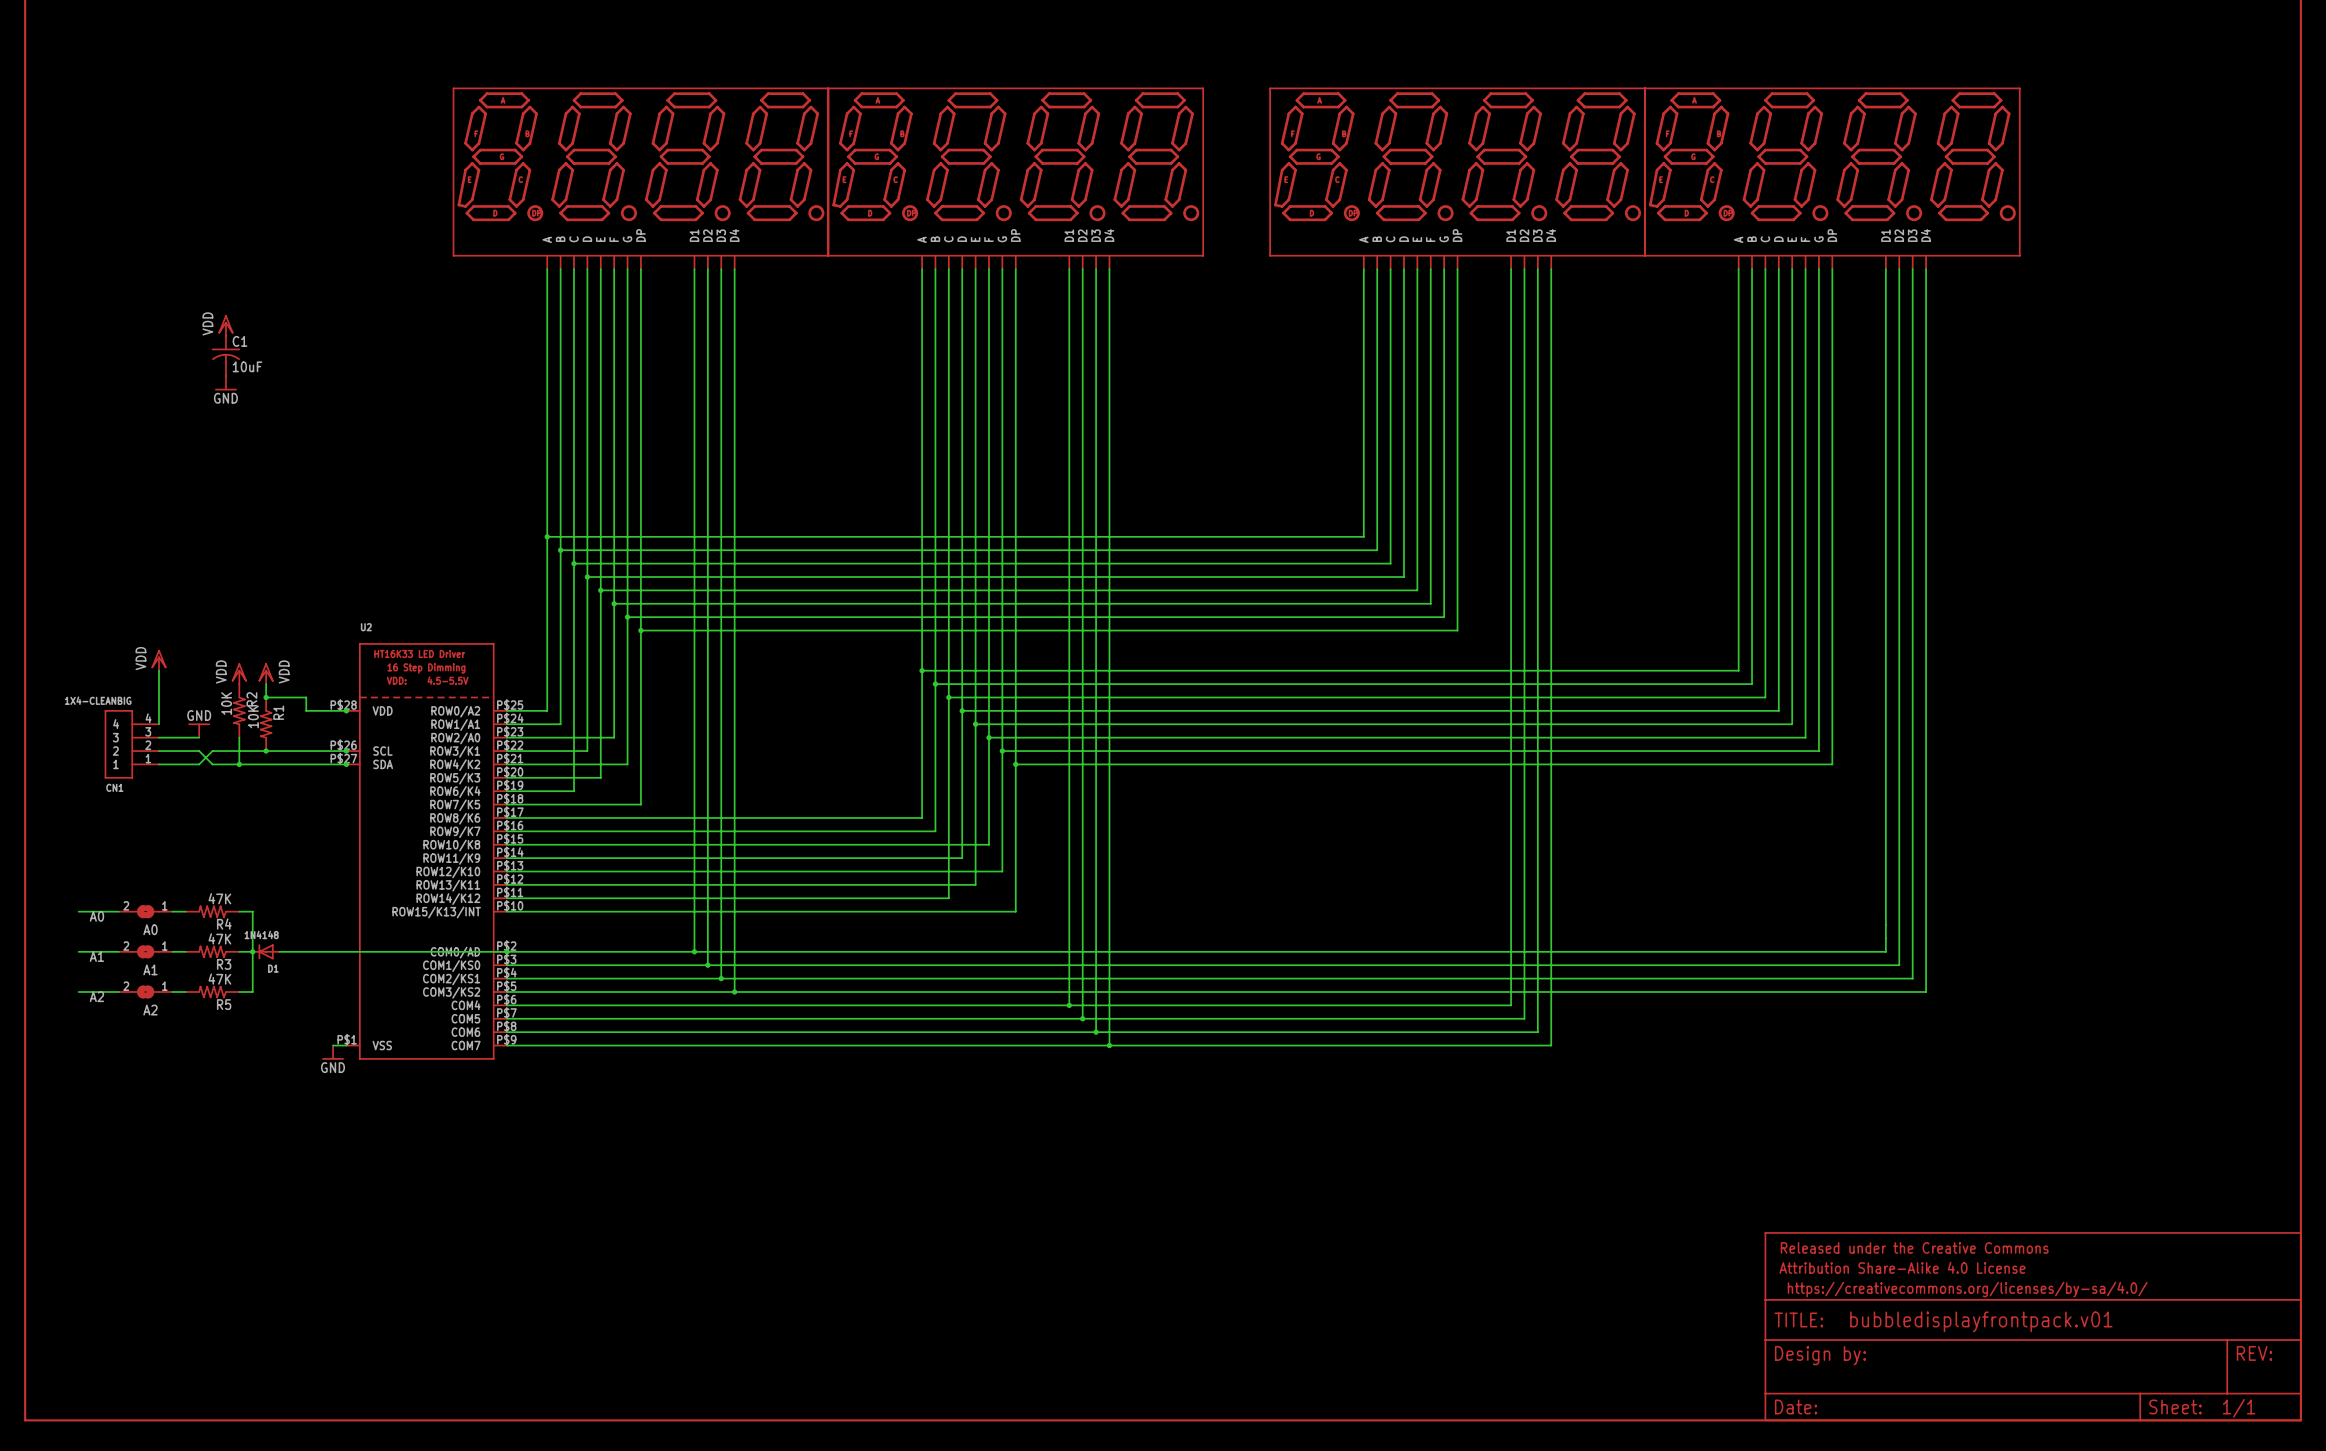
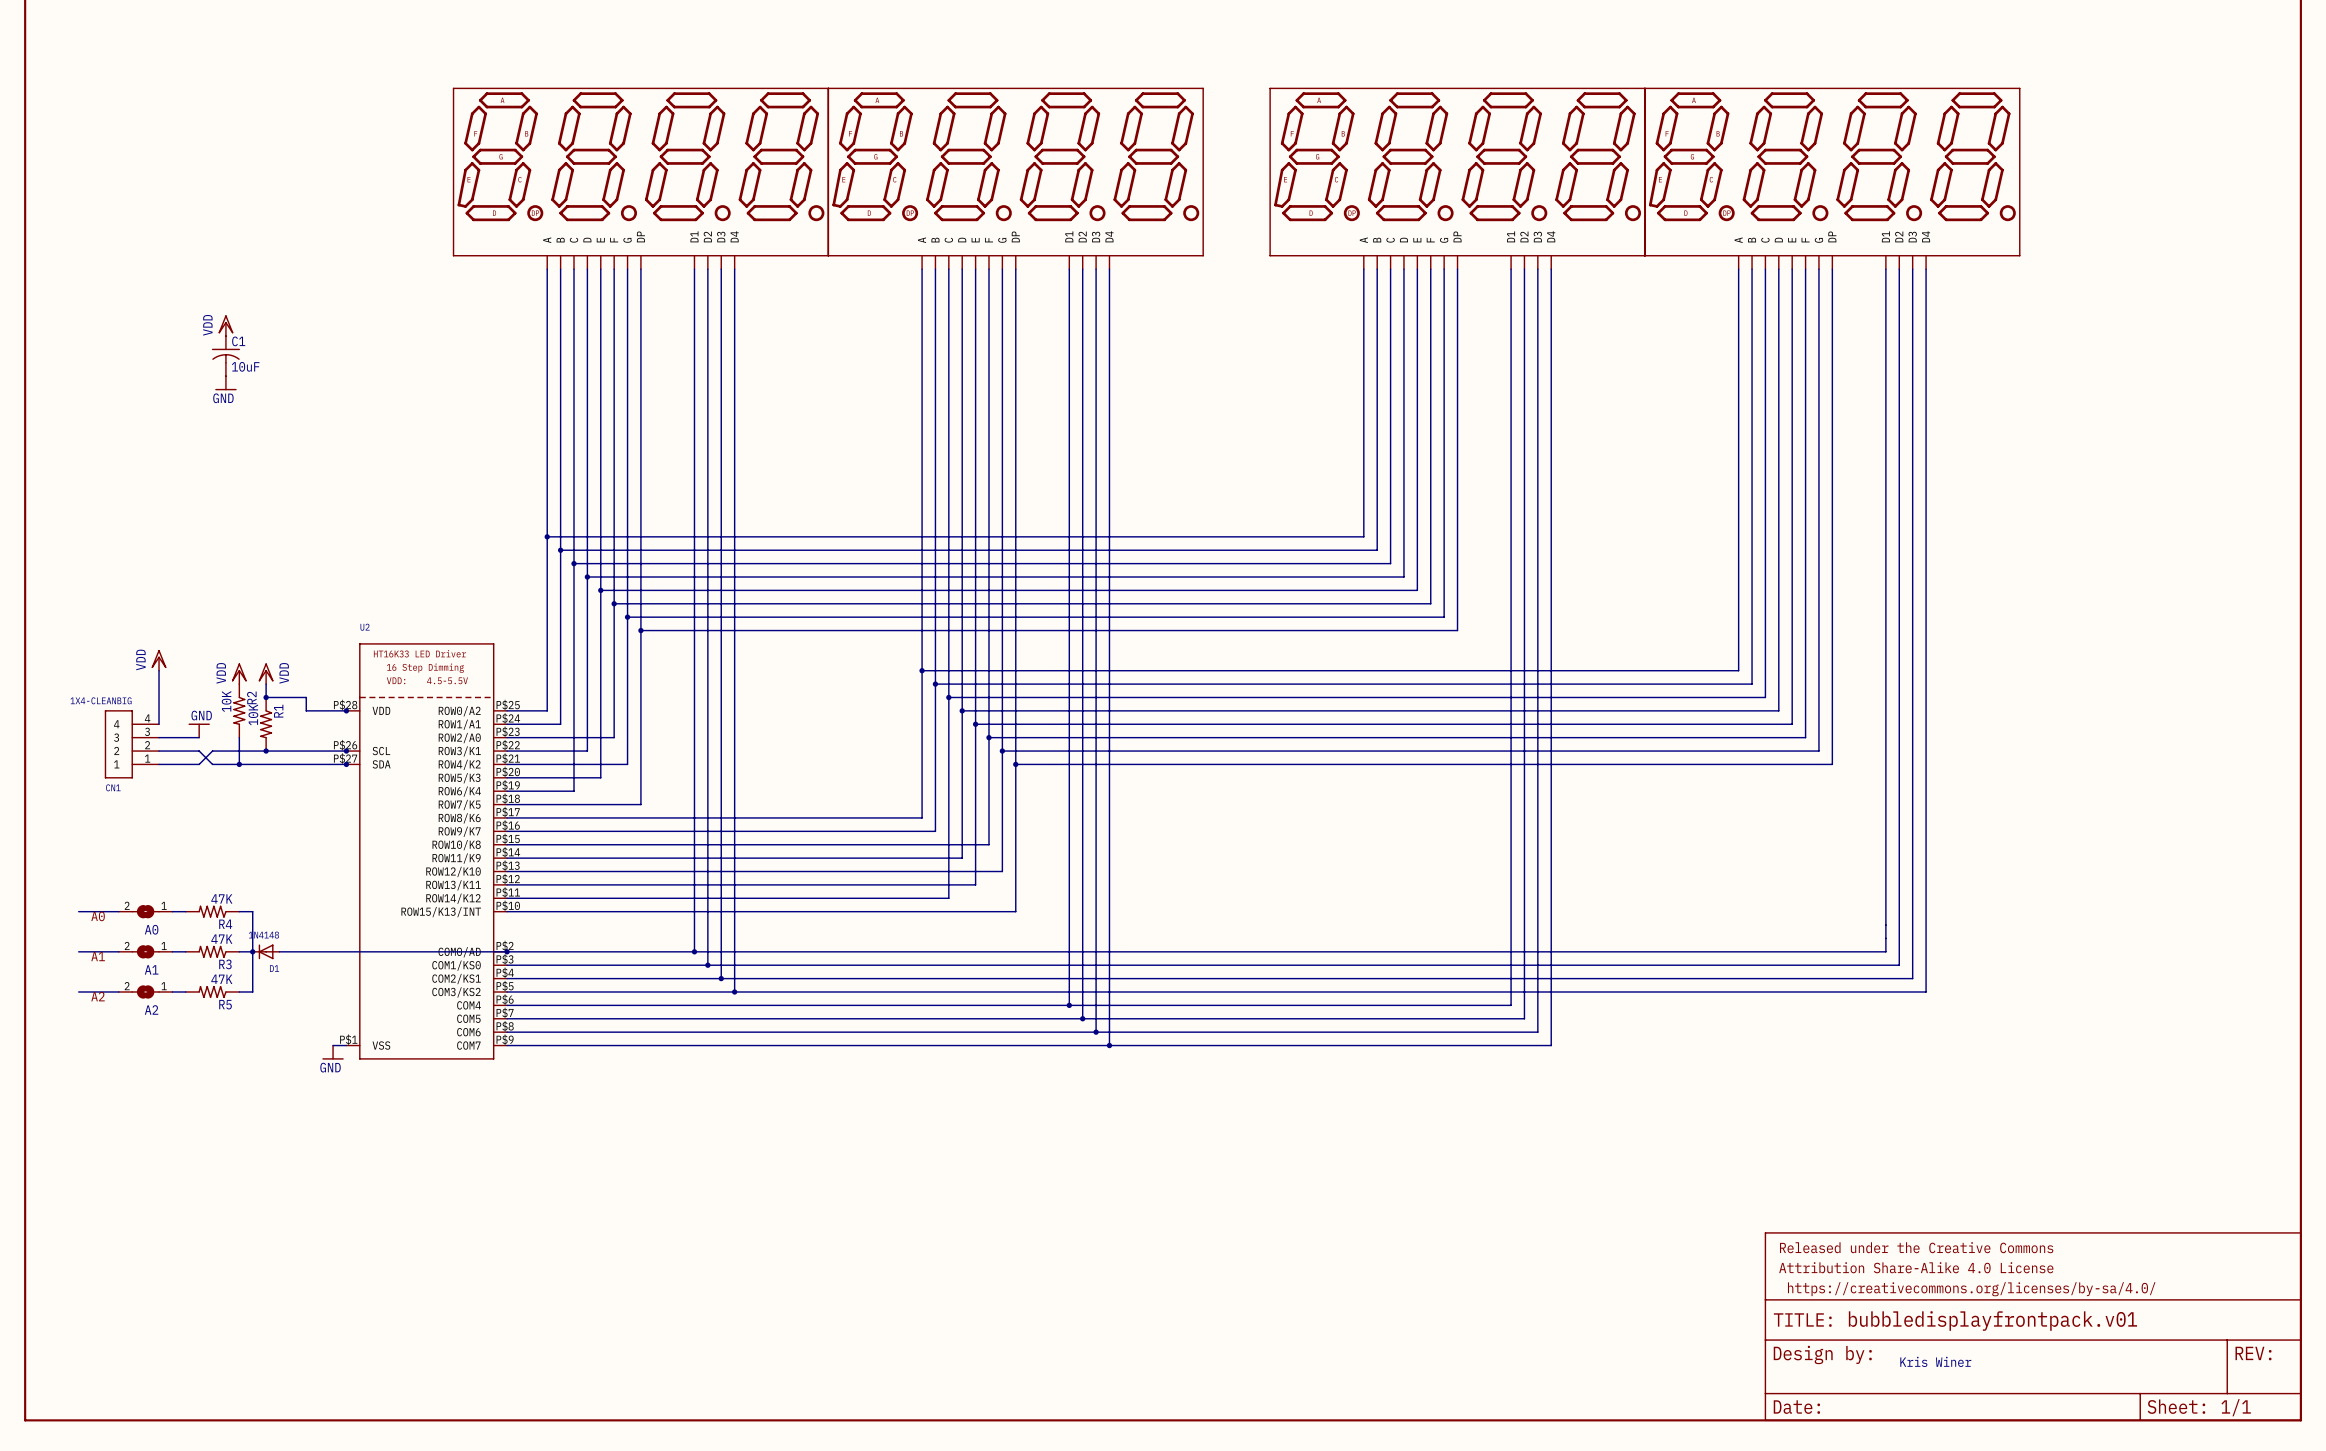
text: none -> Kris Winer (1935, 1361)

